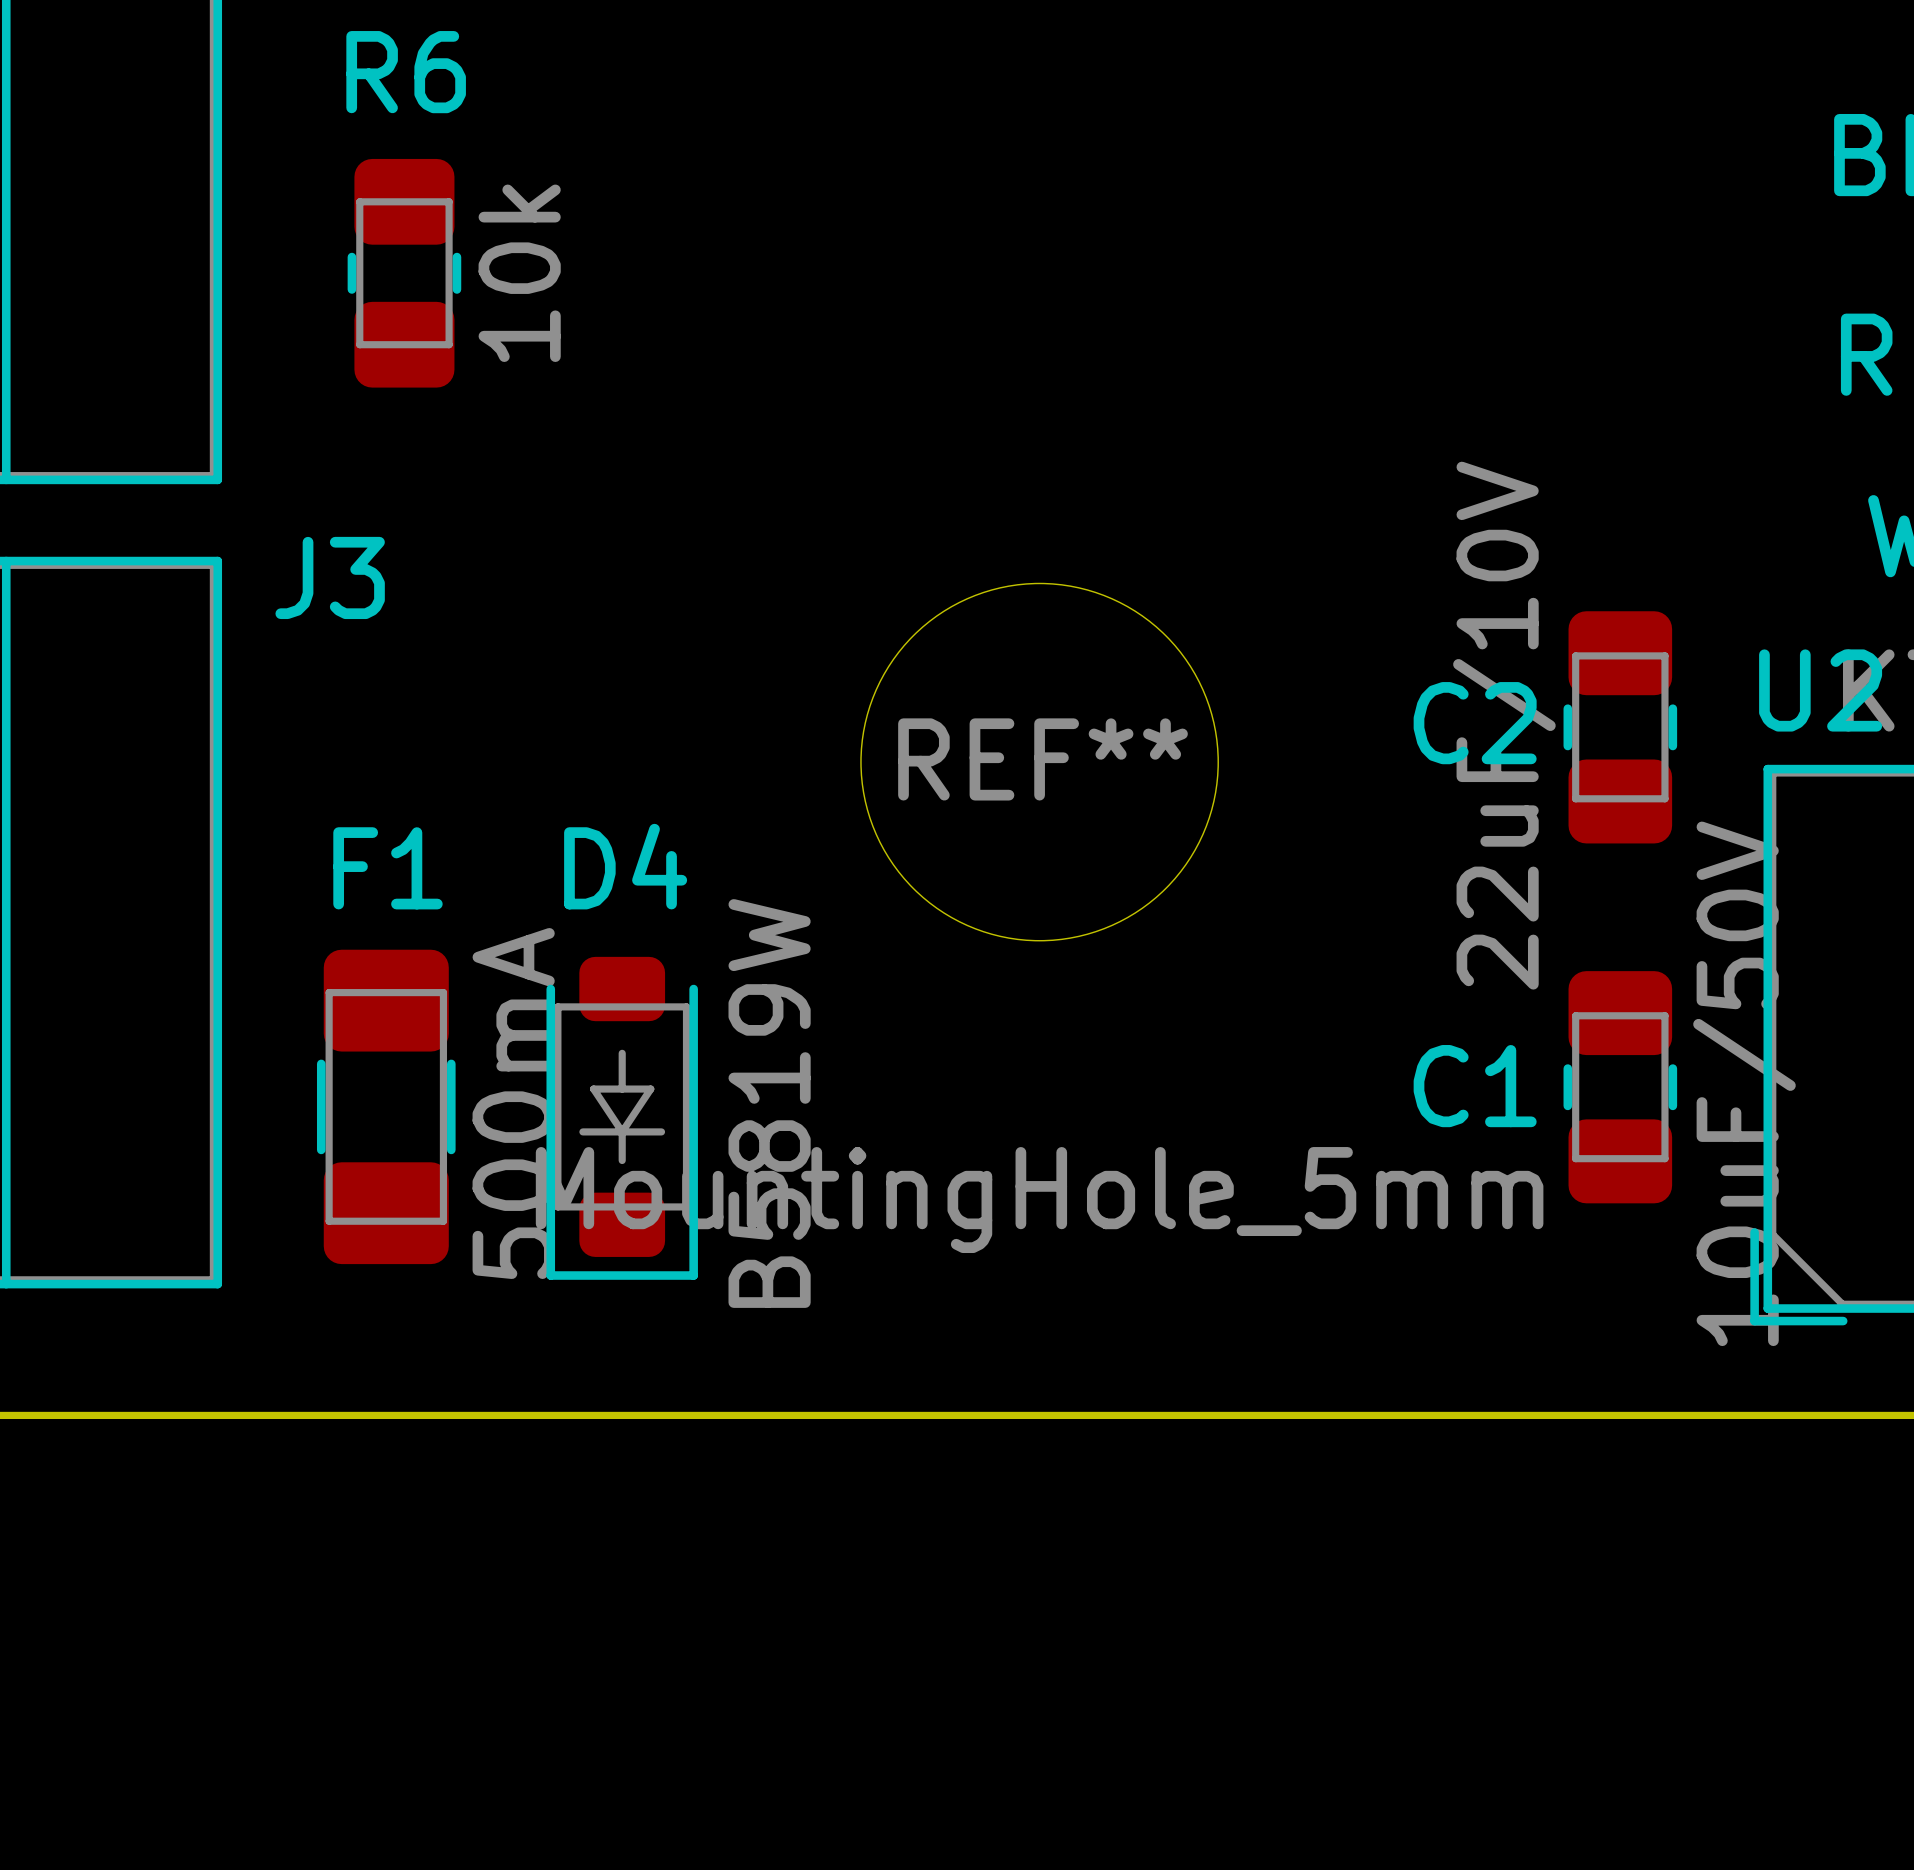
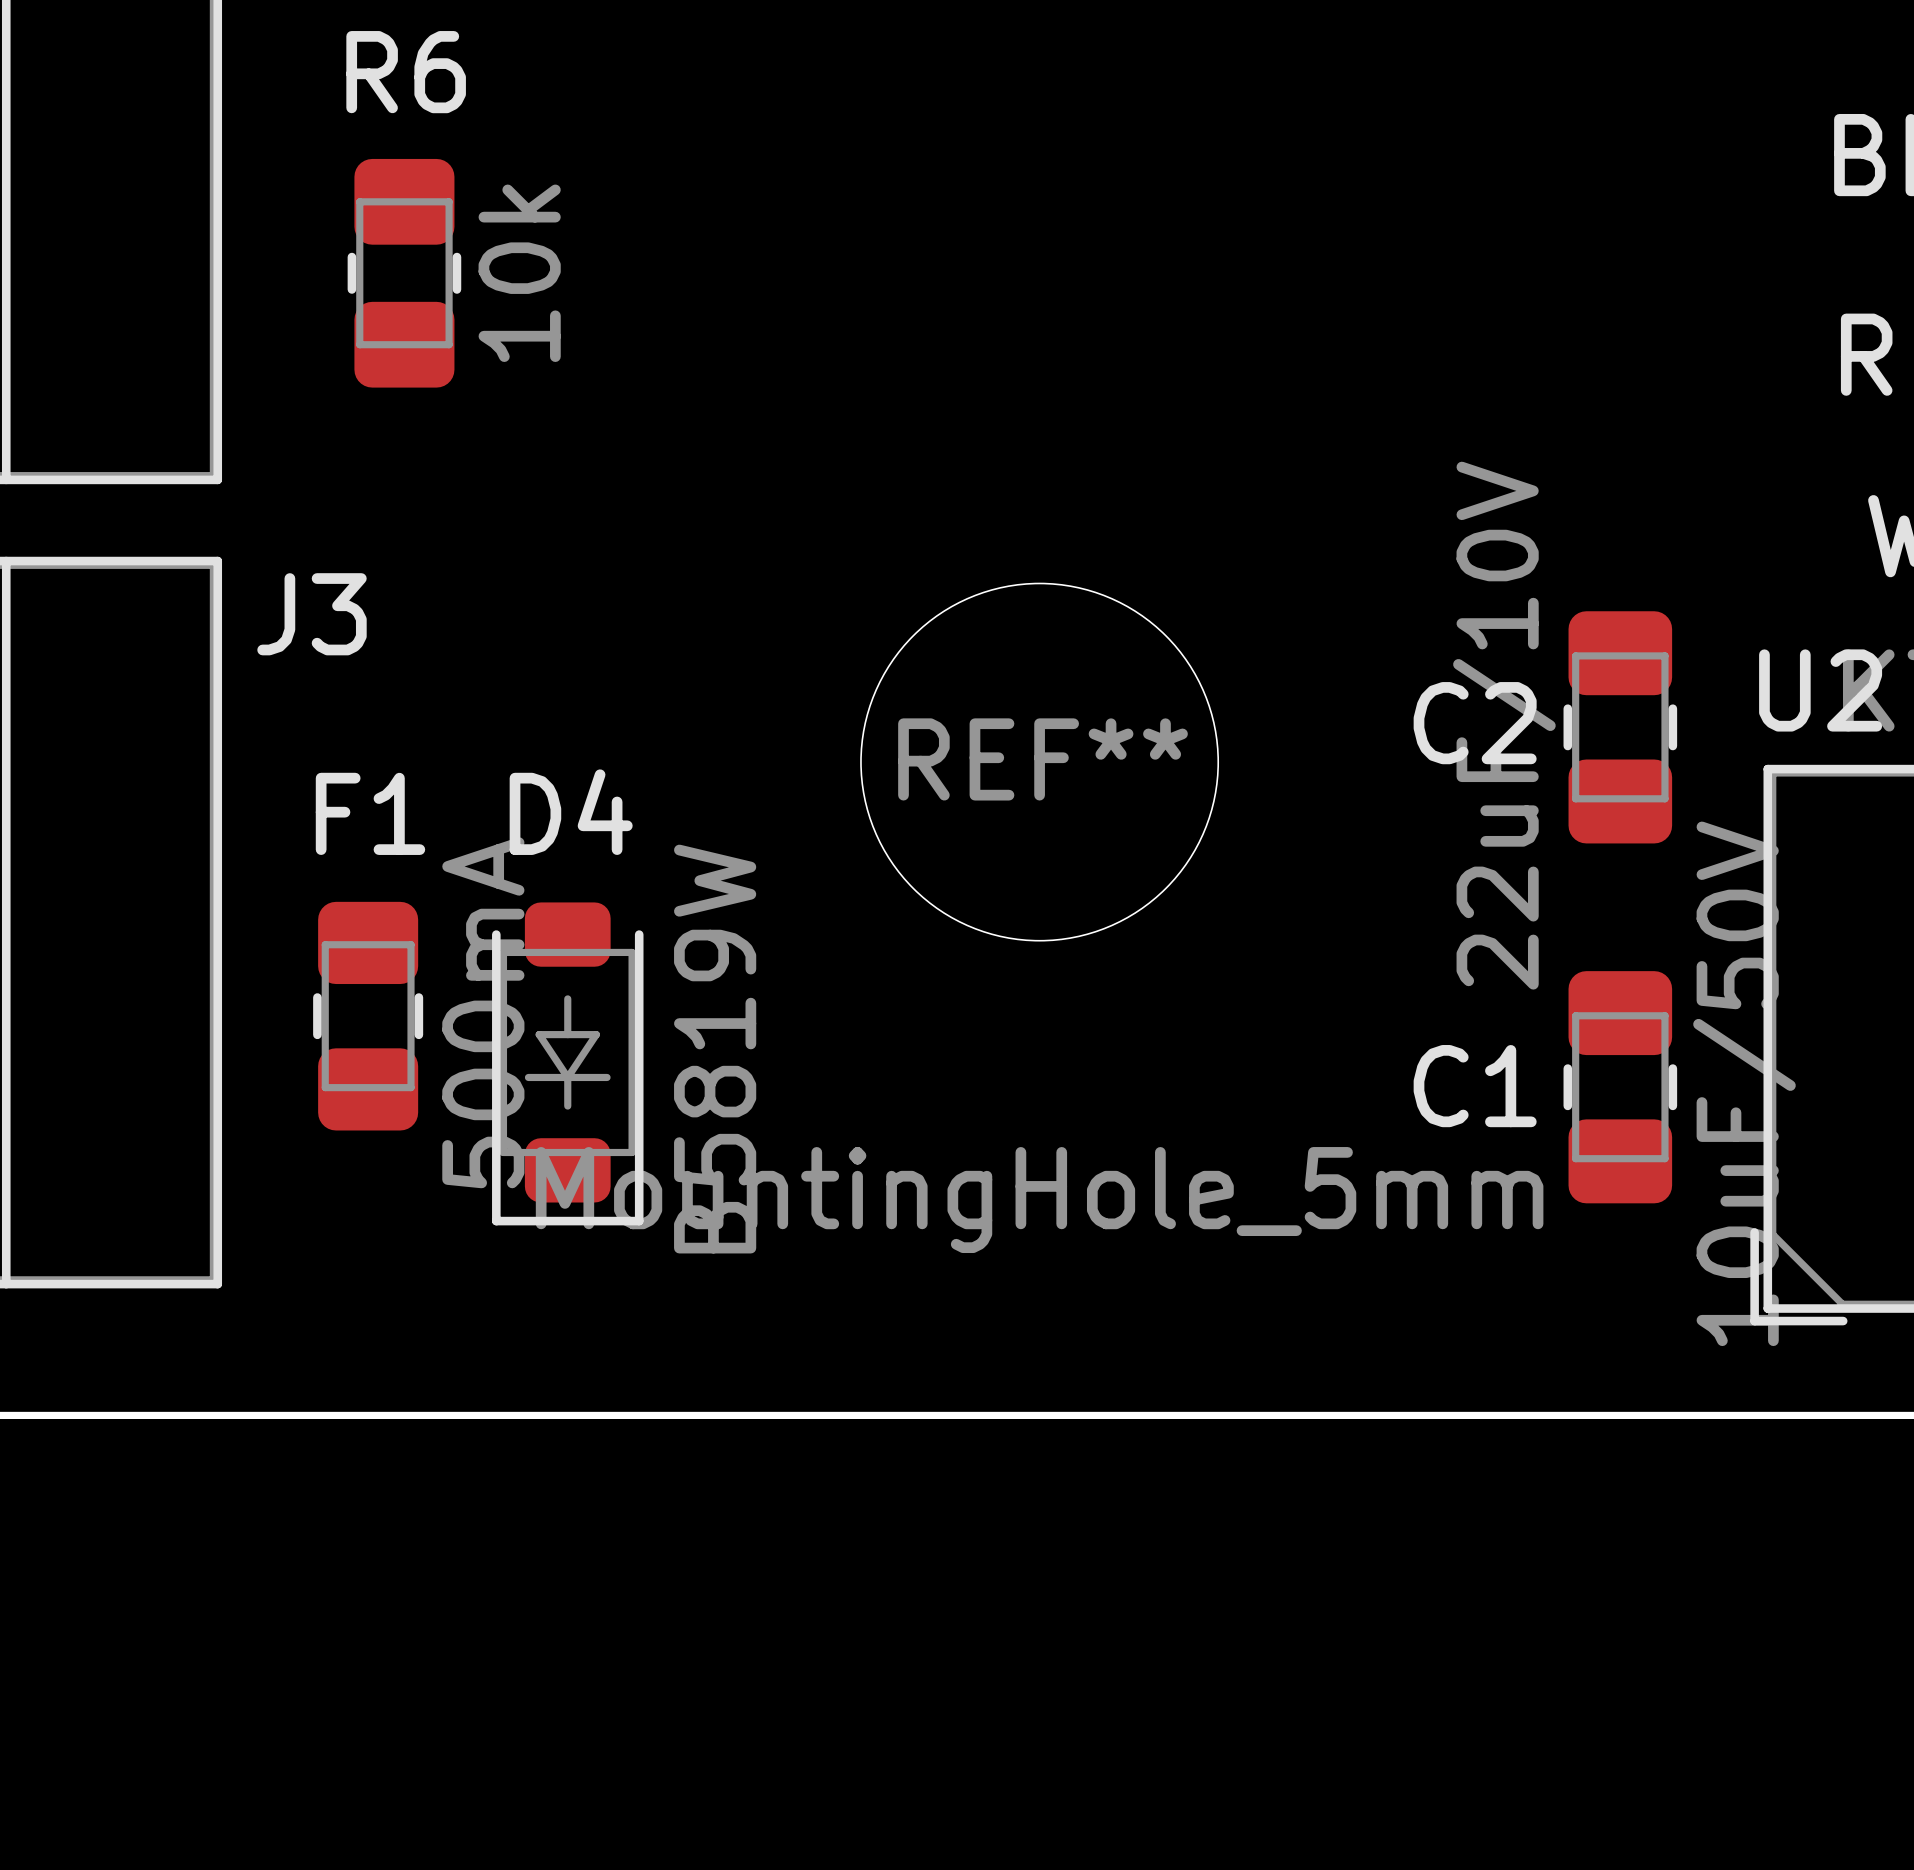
J3 name position: J3 (330, 577) -> J3 (311, 614)
F1 footprint: [316, 949, 456, 1265] -> [313, 901, 424, 1131]
D4 position: (622, 1118) -> (567, 1063)

